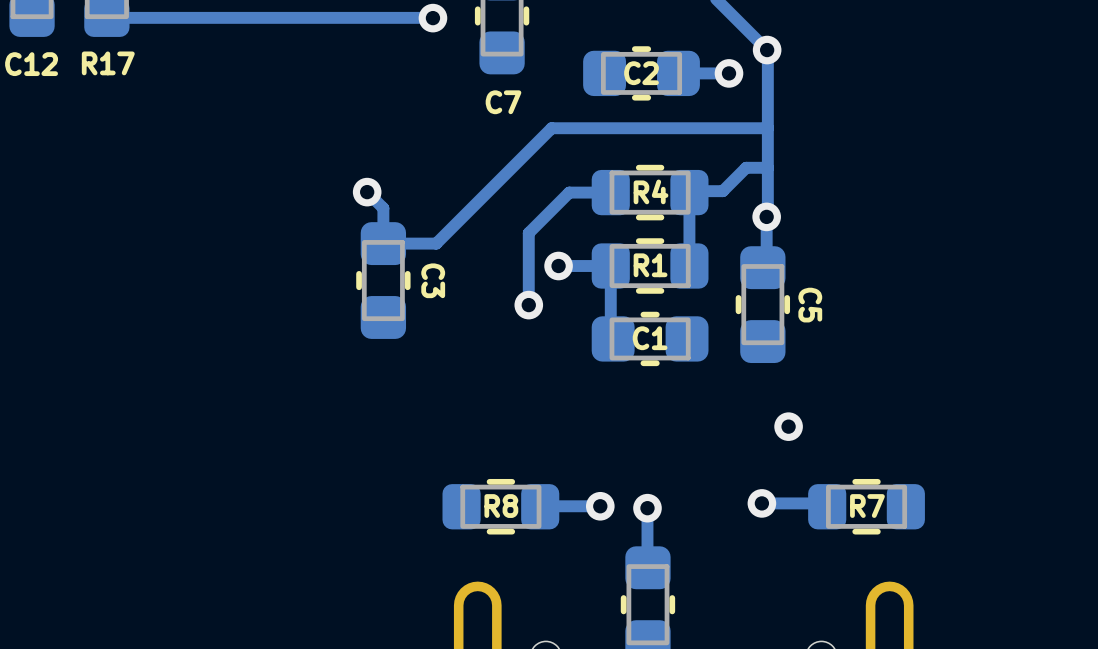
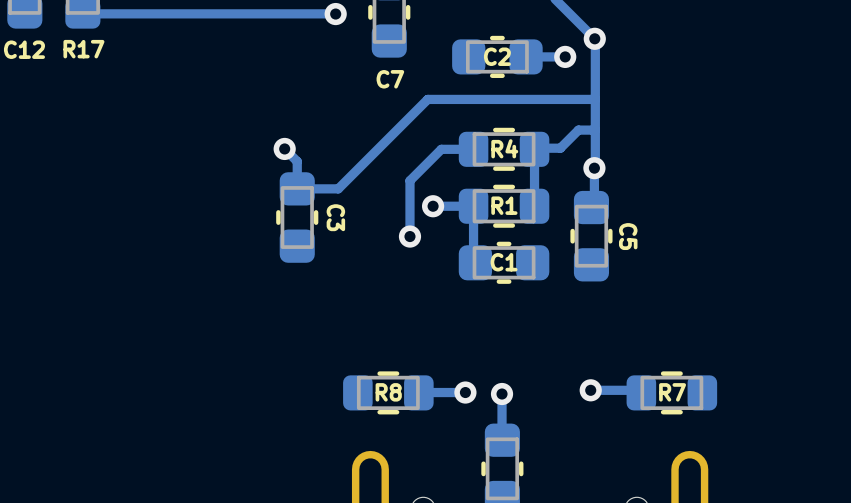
via: (788, 426) -> none

